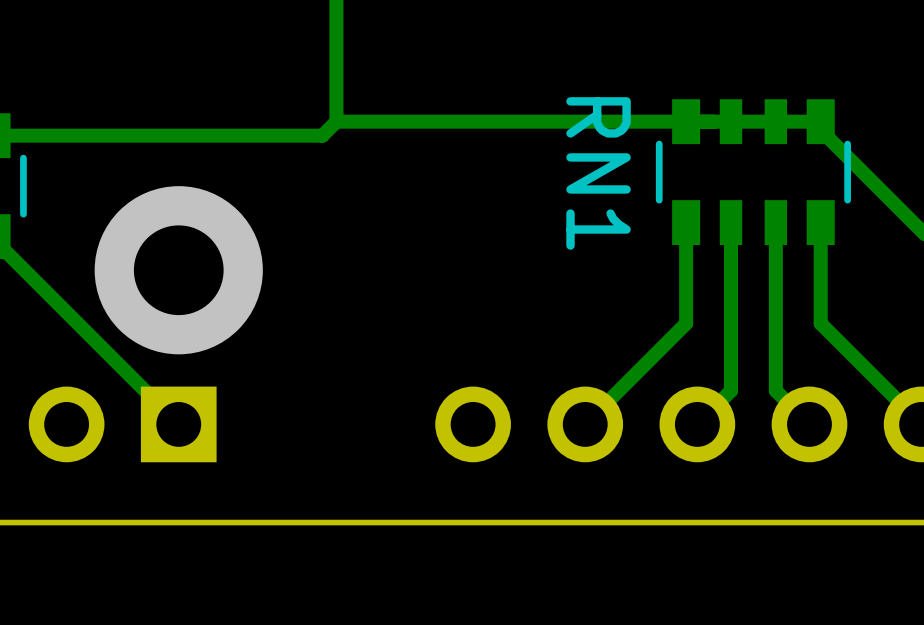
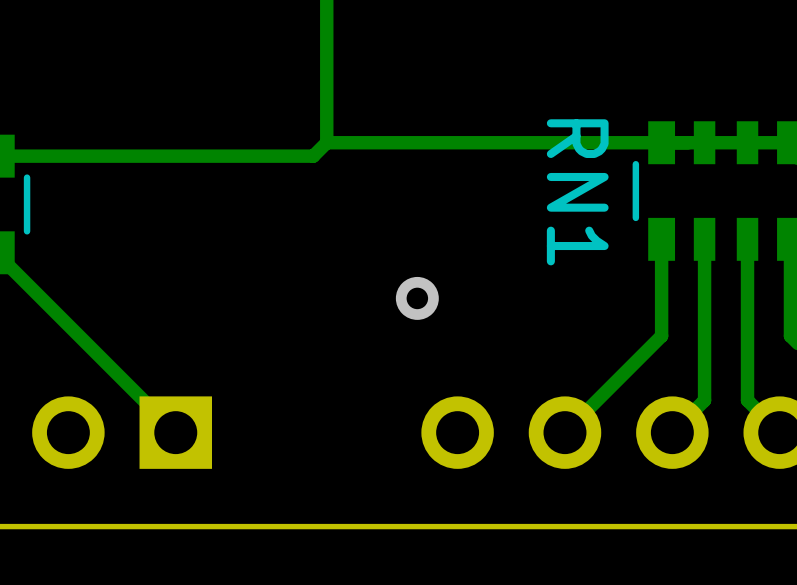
via: (178, 270) -> none
via: none -> (417, 298)

